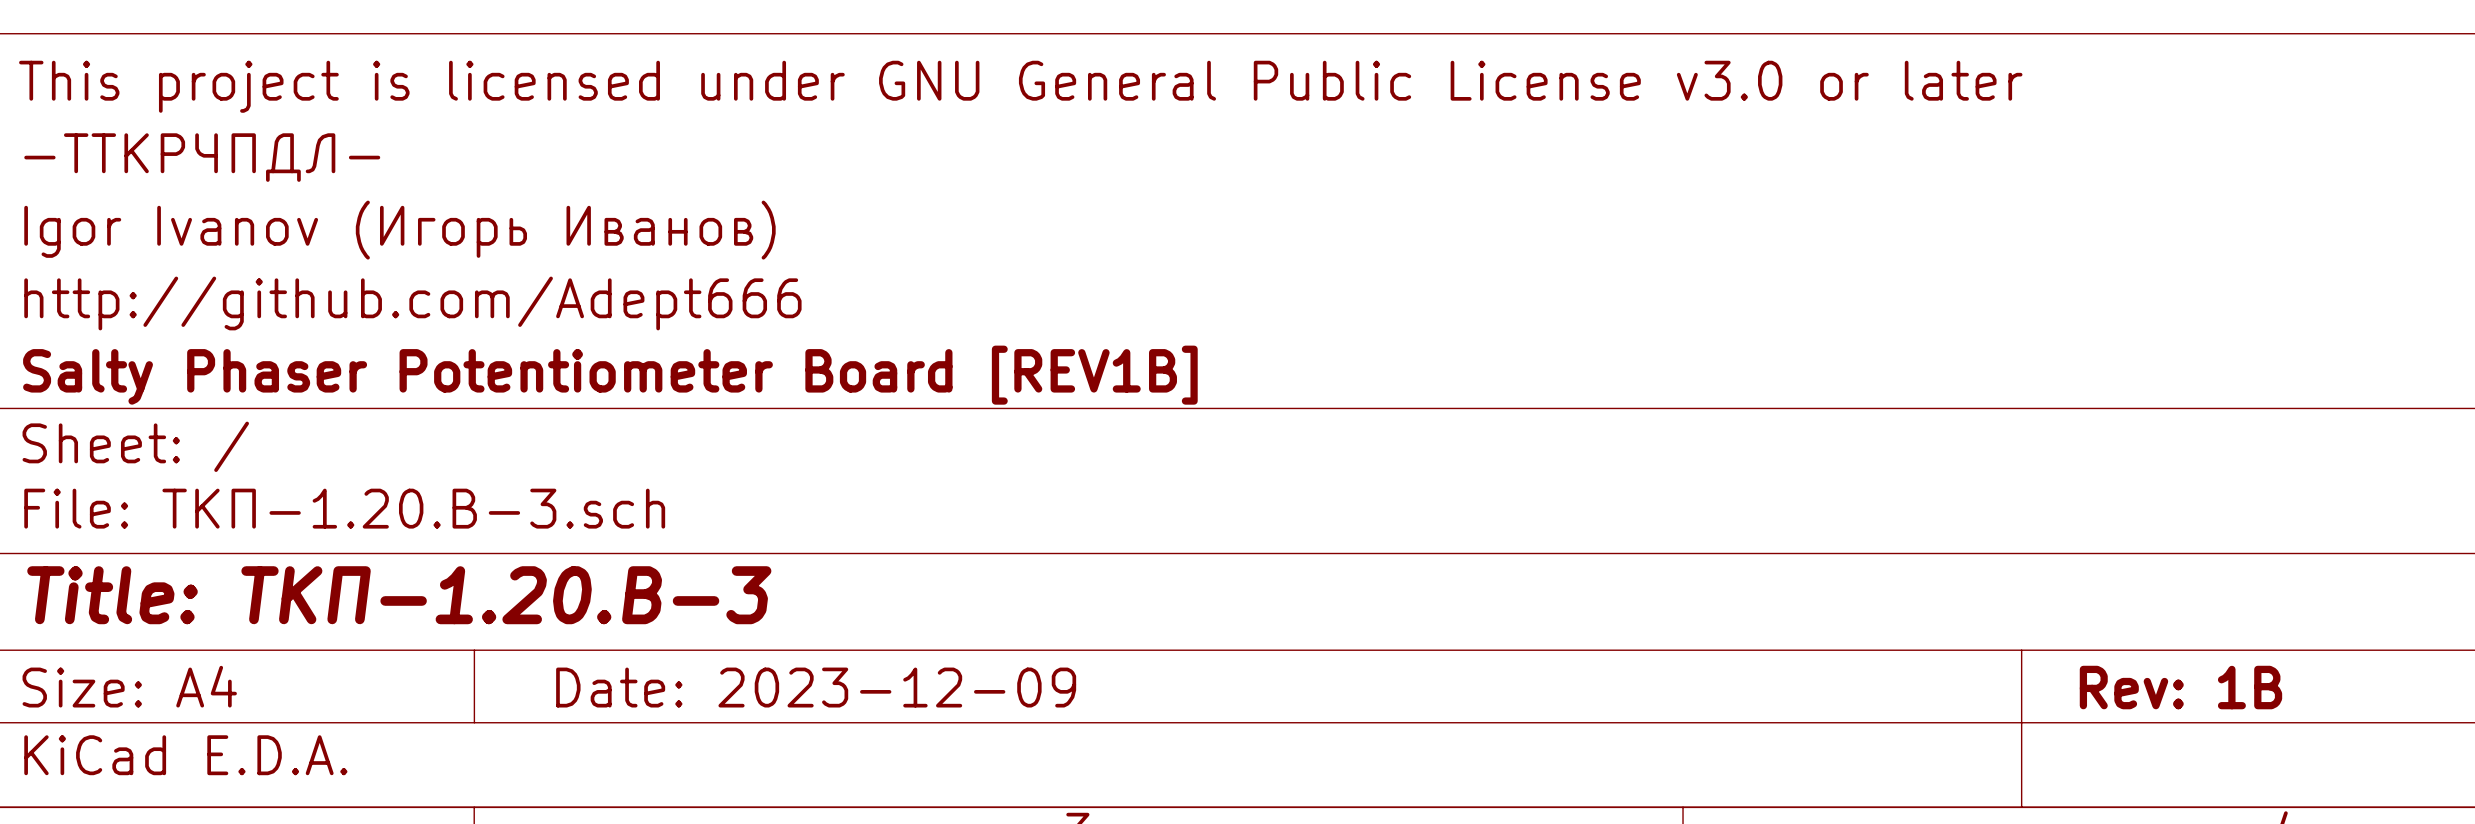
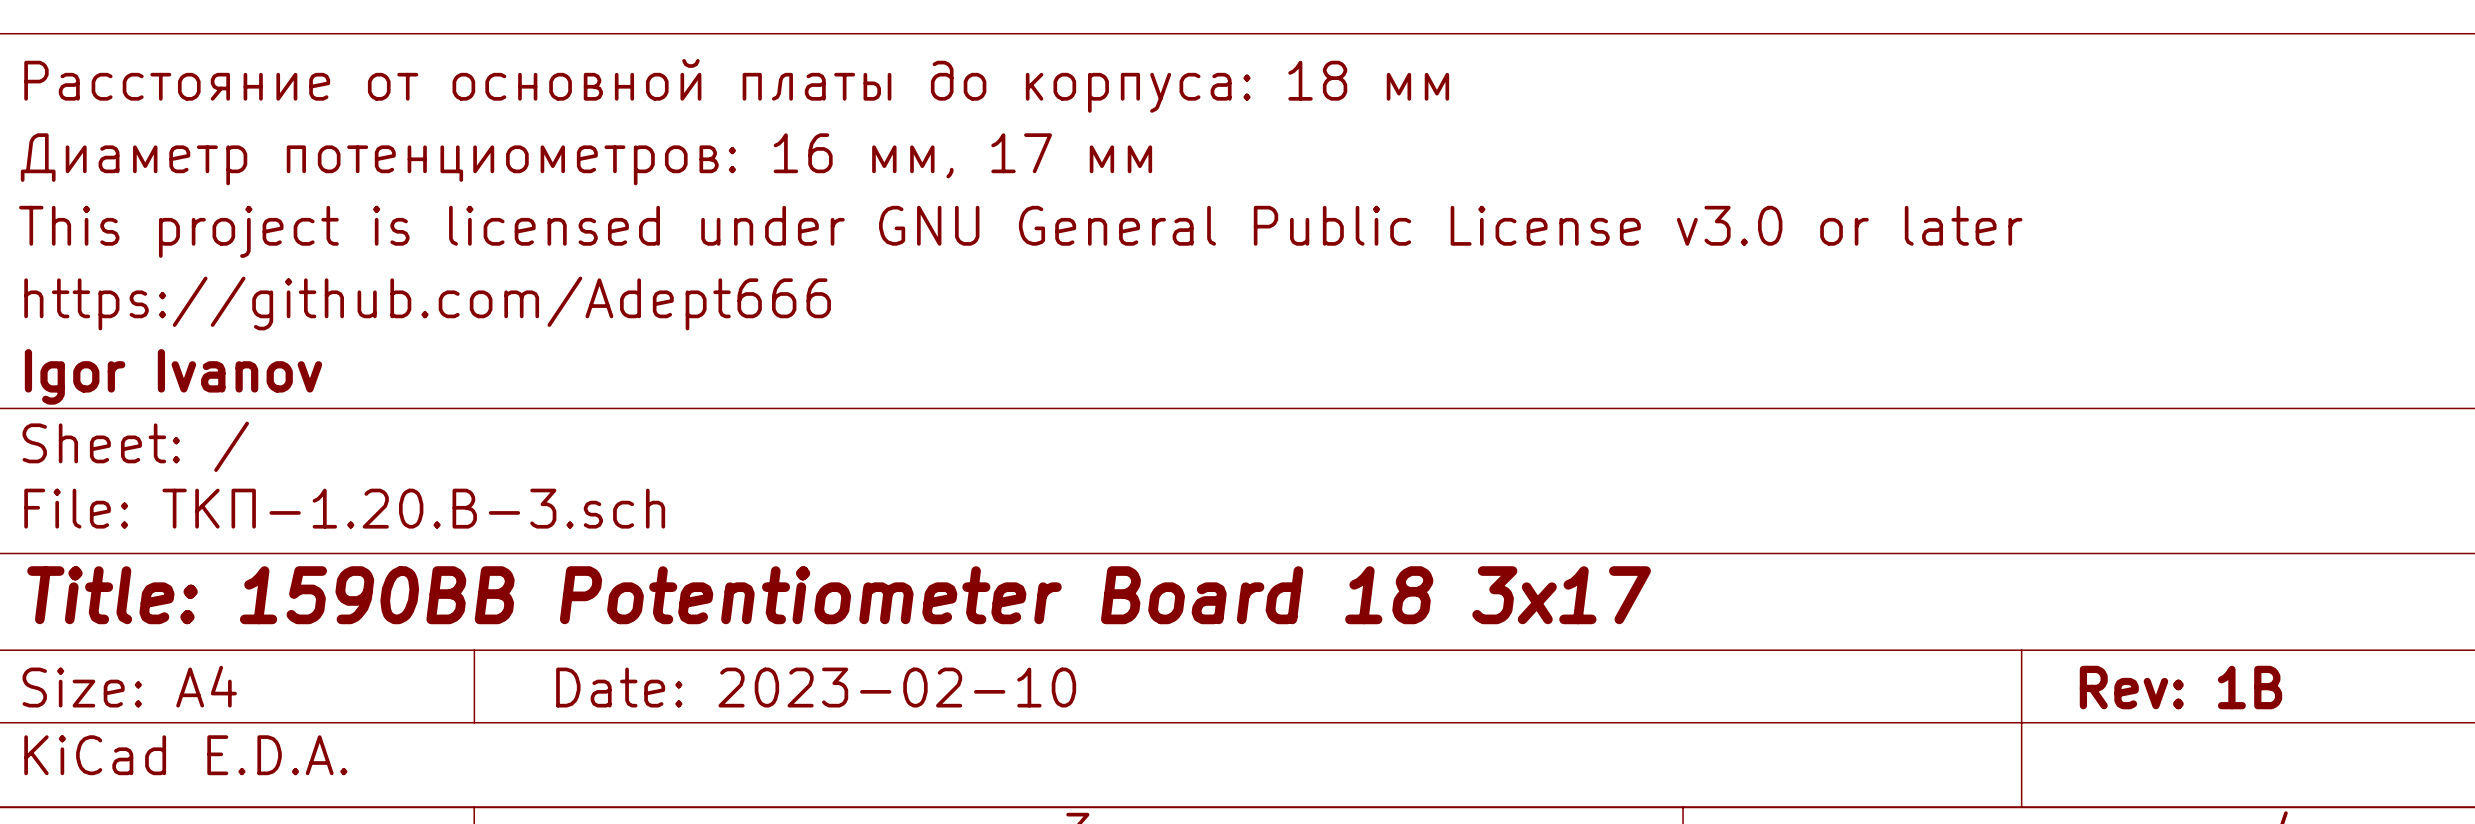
title block: This project is licensed under GNU General Public License v3.0 or later (1020, 86) -> Расстояние от основной платы до корпуса: 18 мм (736, 85)
title block: -ТТКРЧПДЛ- (202, 157) -> Диаметр потенциометров: 16 мм, 17 мм (586, 159)
title block: Igor Ivanov (Игорь Иванов) (399, 230) -> This project is licensed under GNU General Public License v3.0 or later (1020, 231)
title block: http://github.com/Adept666 (412, 303) -> https://github.com/Adept666 (427, 303)
title block: Salty Phaser Potentiometer Board [REV1B] (610, 375) -> Igor Ivanov (173, 376)
title block: Title: ТКП-1.20.B-3 (399, 595) -> Title: 1590BB Potentiometer Board 18 3x17 (839, 595)
title block: Date: 2023-12-09 (816, 687) -> Date: 2023-02-10 (816, 687)

